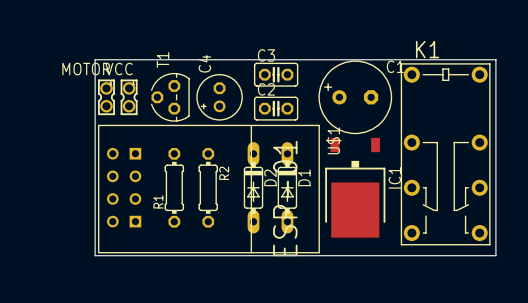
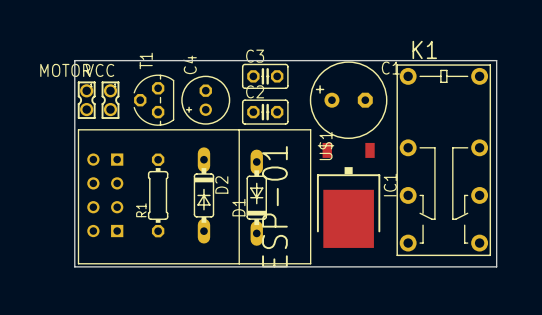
R2: (208, 187) -> none
D2 position: (253, 187) -> (203, 195)
D1 rotation: 0° (287, 187) -> 180° (256, 197)

